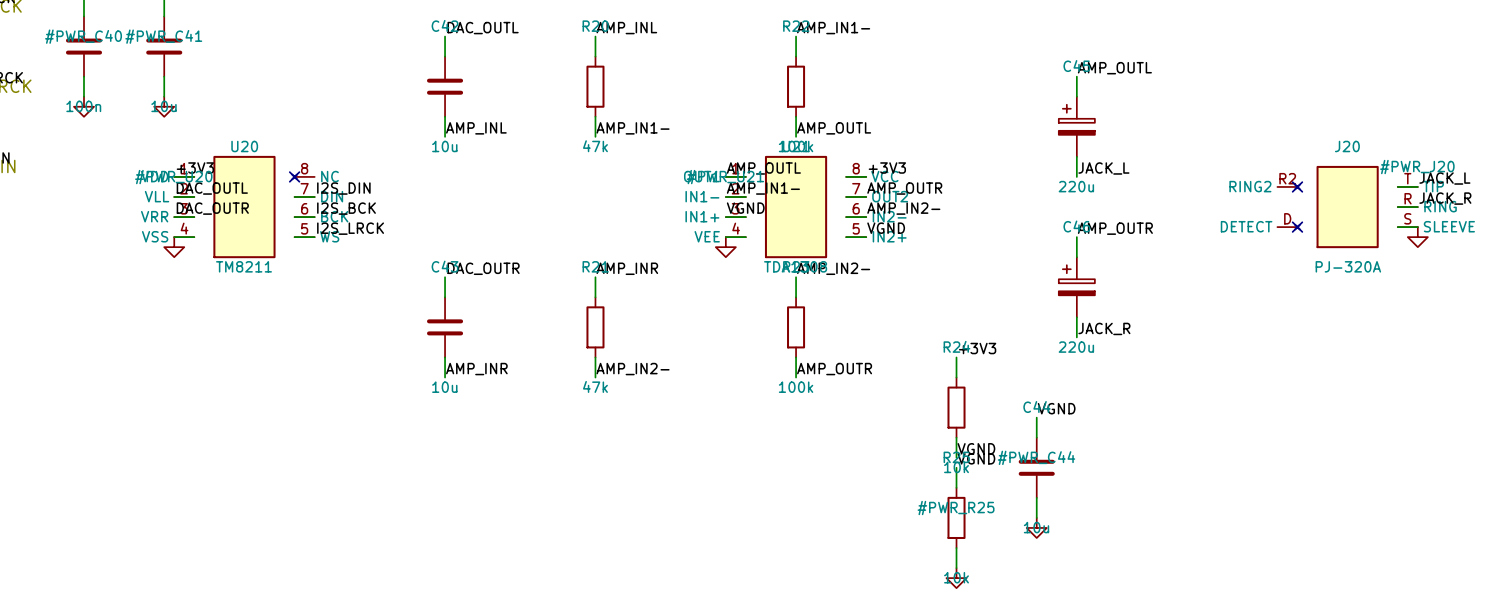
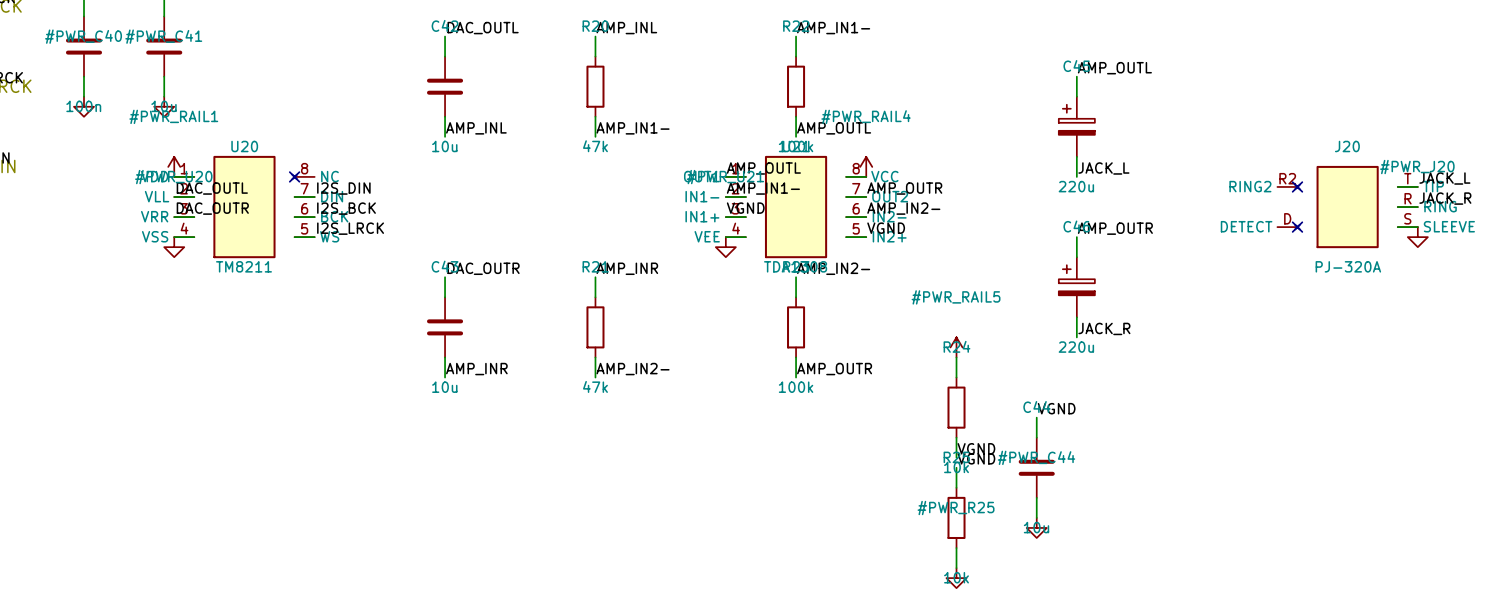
#PWR_RAIL1: none -> (174, 166)
#PWR_RAIL4: none -> (866, 166)
label: +3V3 (195, 168) -> none
label: +3V3 (887, 168) -> none
#PWR_RAIL5: none -> (956, 347)
label: +3V3 (977, 348) -> none

